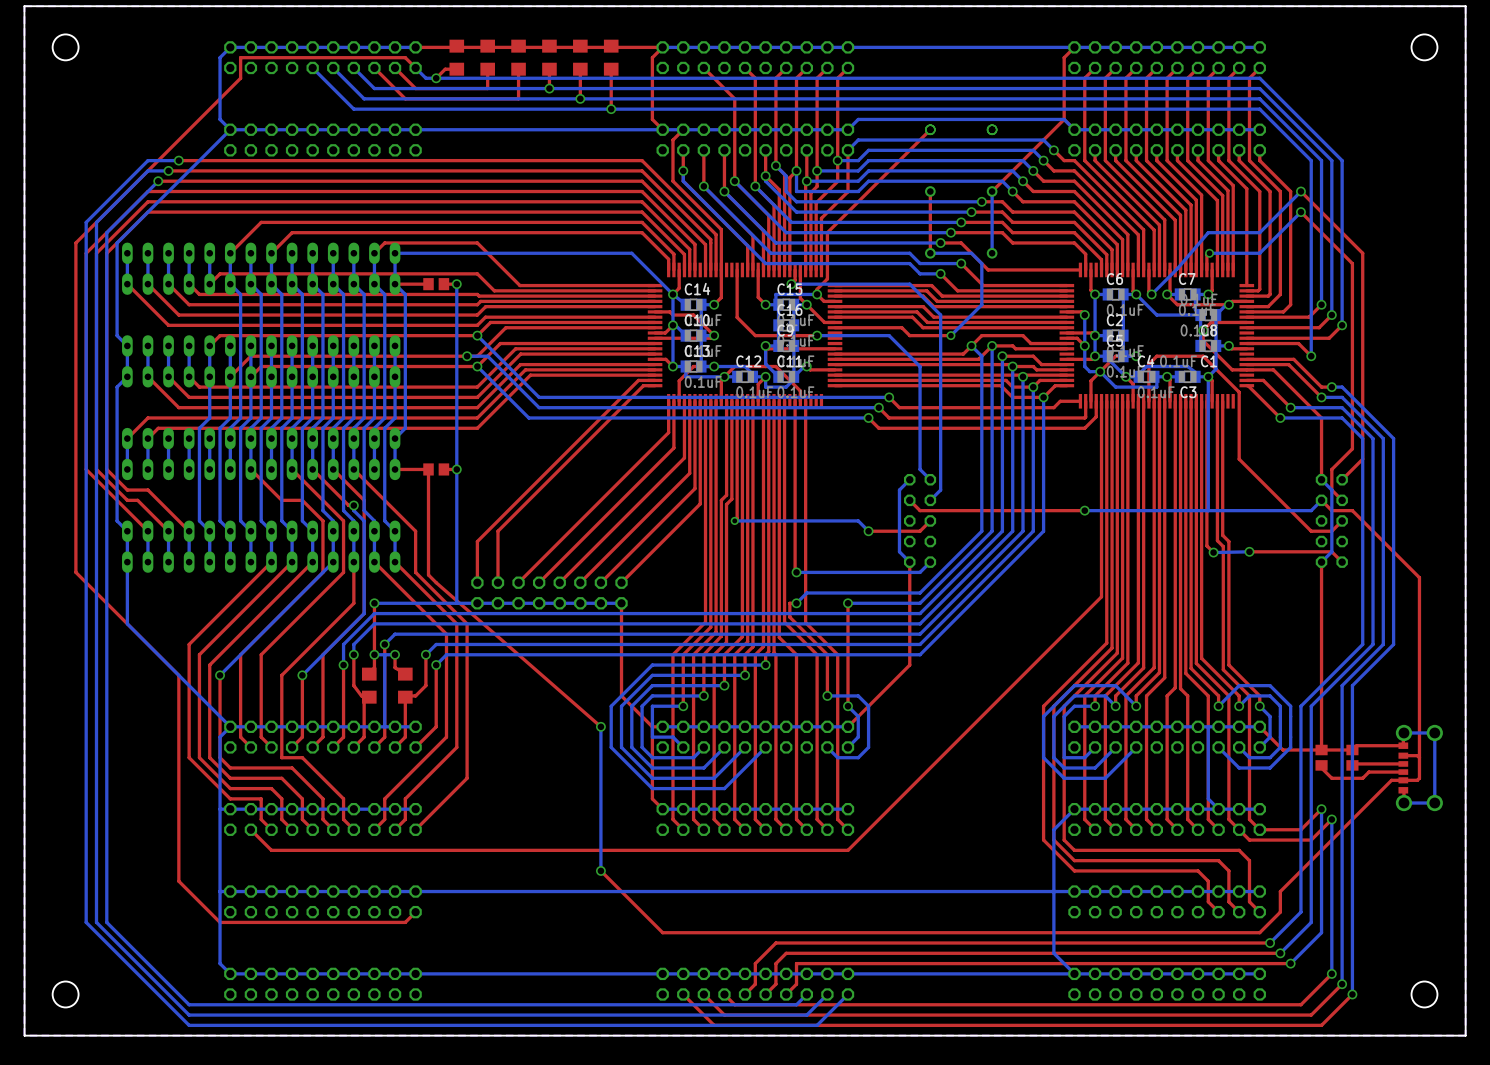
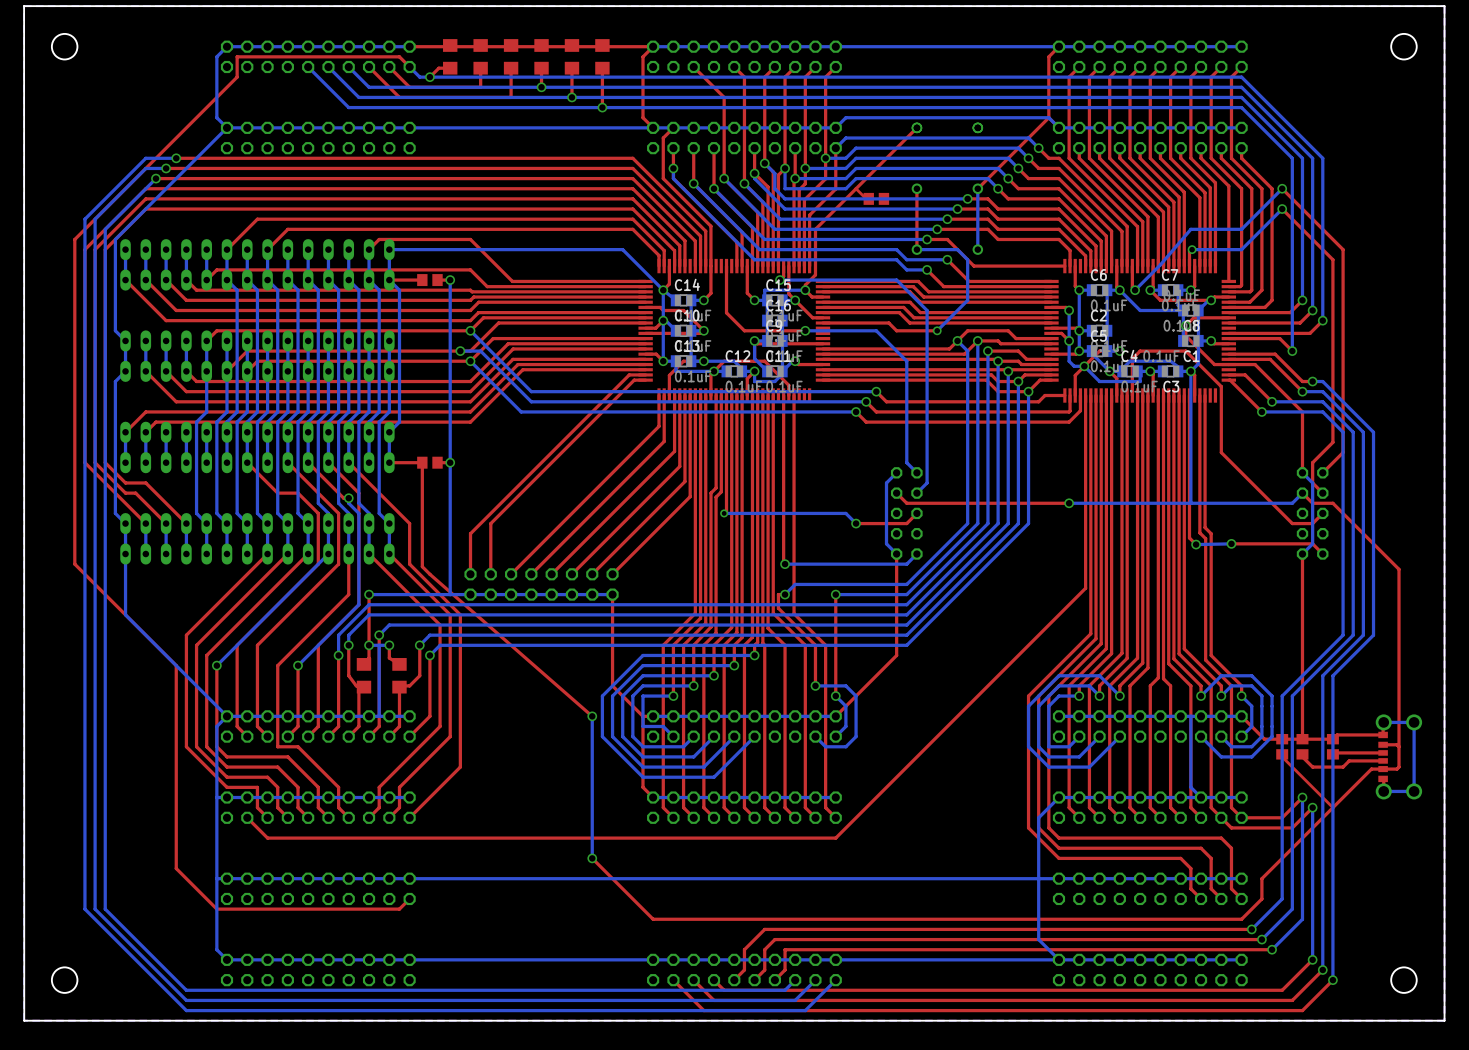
top track: none -> (856, 188) (866, 198) (868, 198)
part: none -> (876, 198)
part: none -> (1282, 746)
top track: none -> (1282, 754) (1282, 756) (1332, 807)

